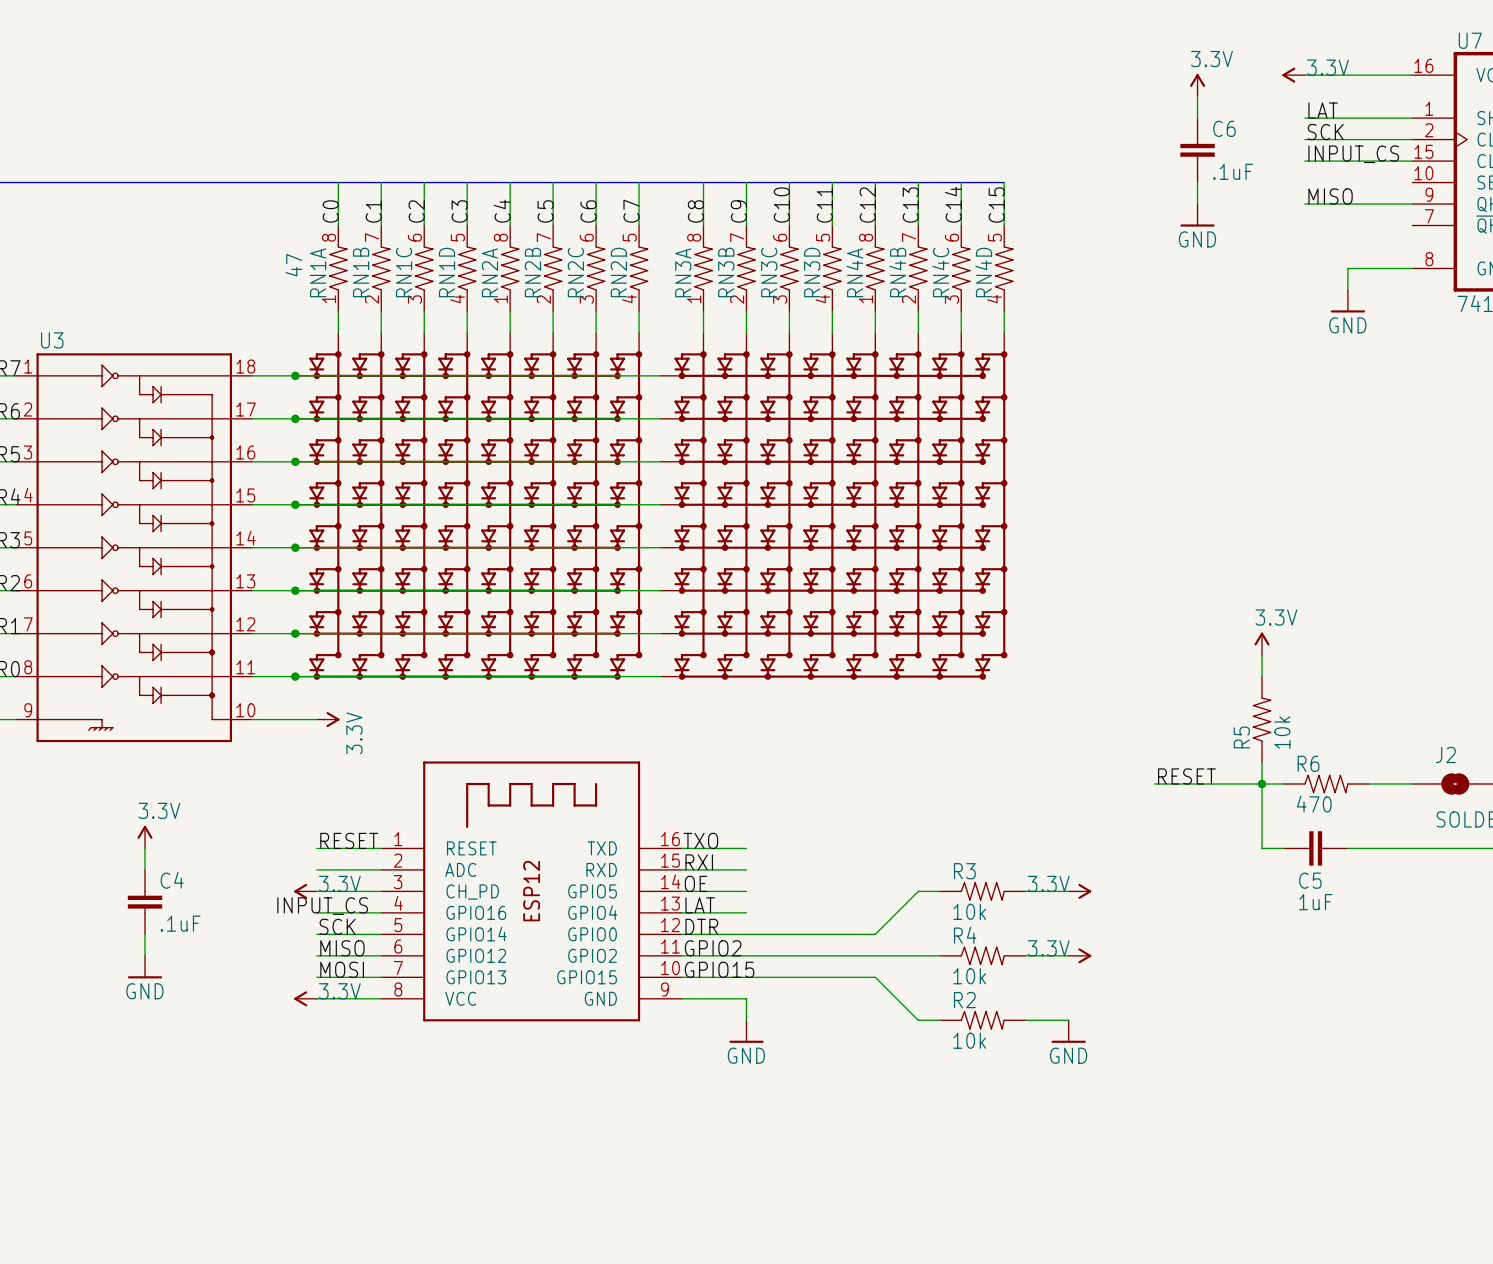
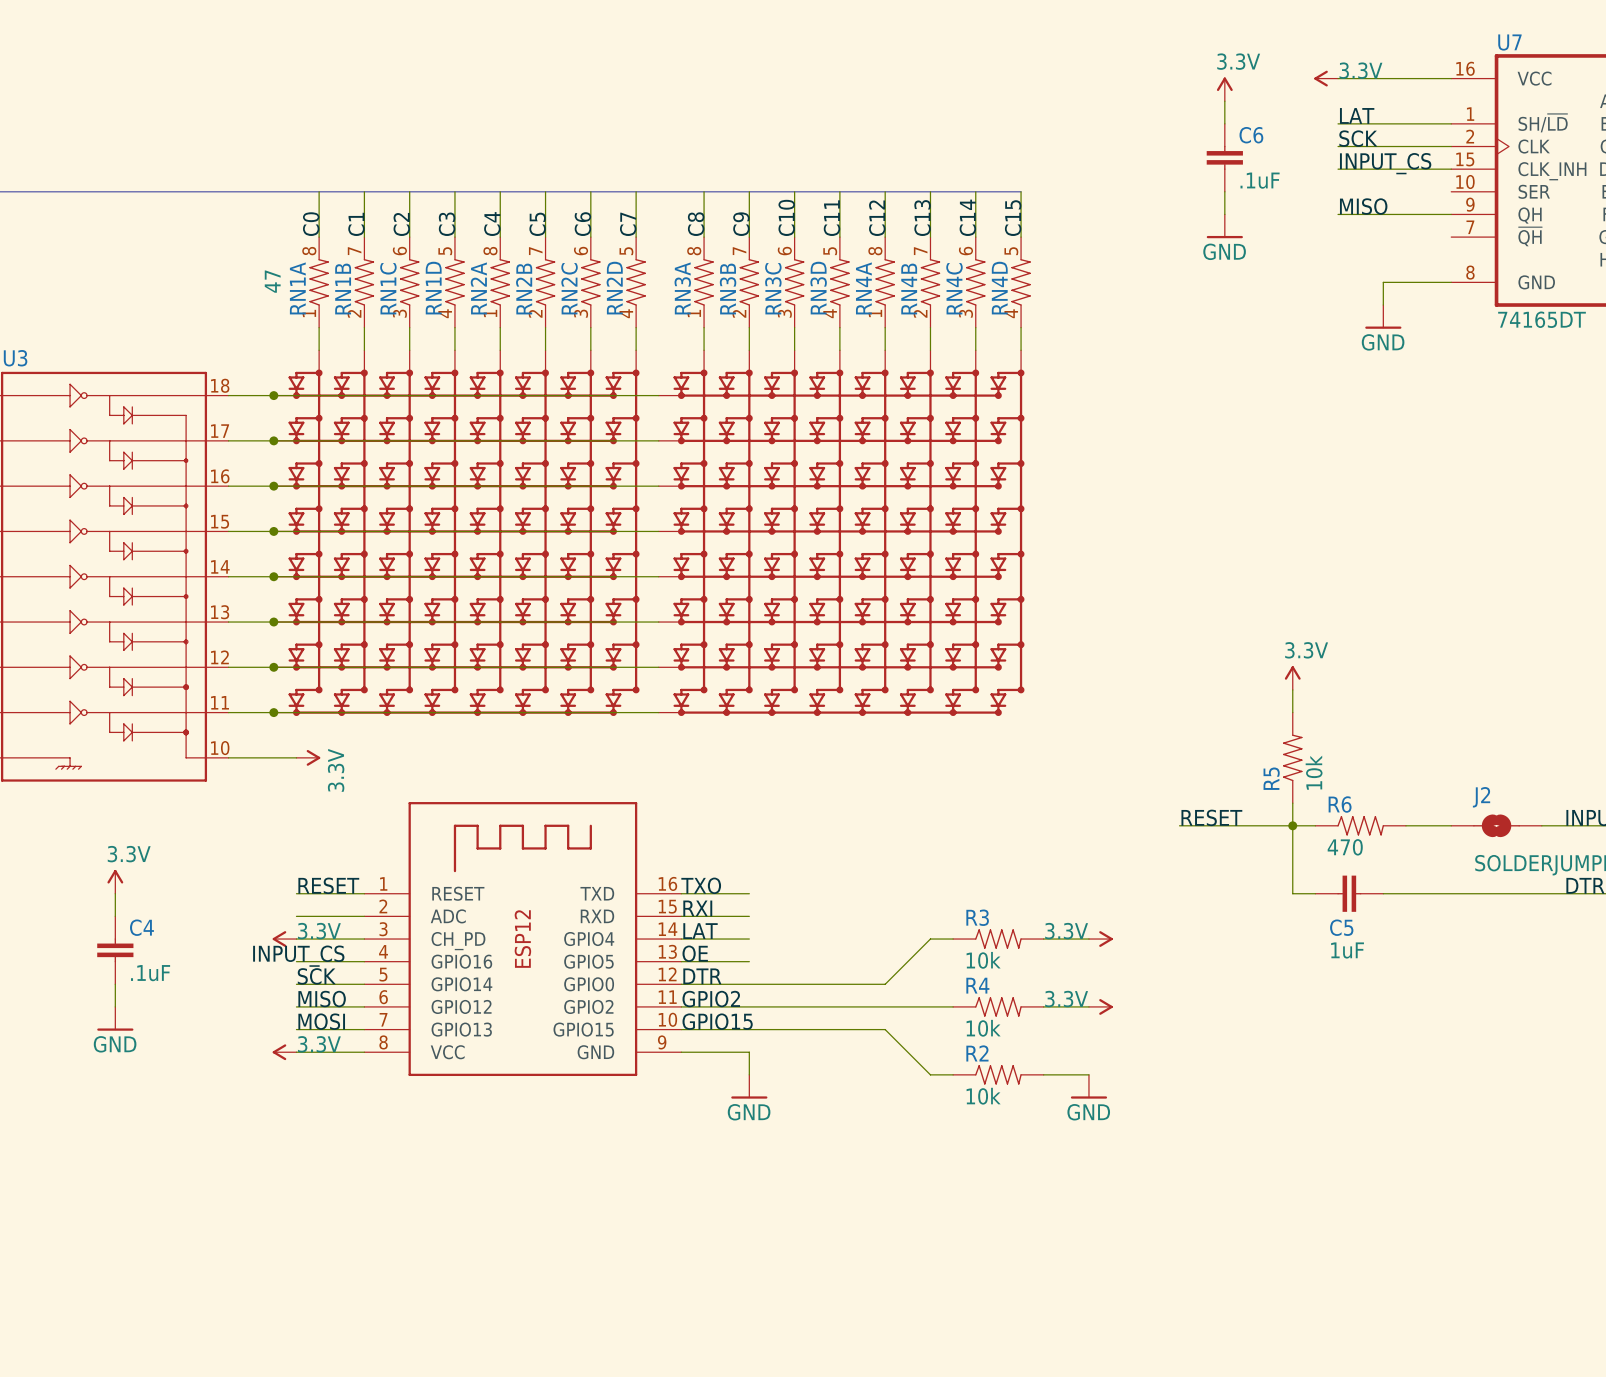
label: OE (696, 883) -> LAT (700, 931)
part pin name: GPIO5 (592, 891) -> GPIO4 (589, 939)
label: LAT (700, 905) -> OE (695, 953)
part pin name: GPIO4 (592, 912) -> GPIO5 (588, 961)

